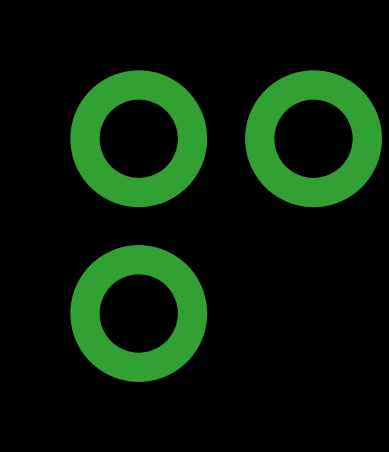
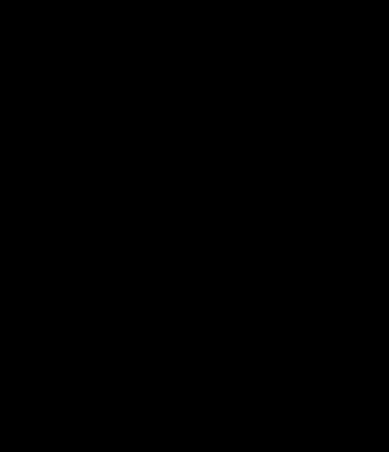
part: (138, 138) -> none
part: (313, 138) -> none
part: (138, 313) -> none

